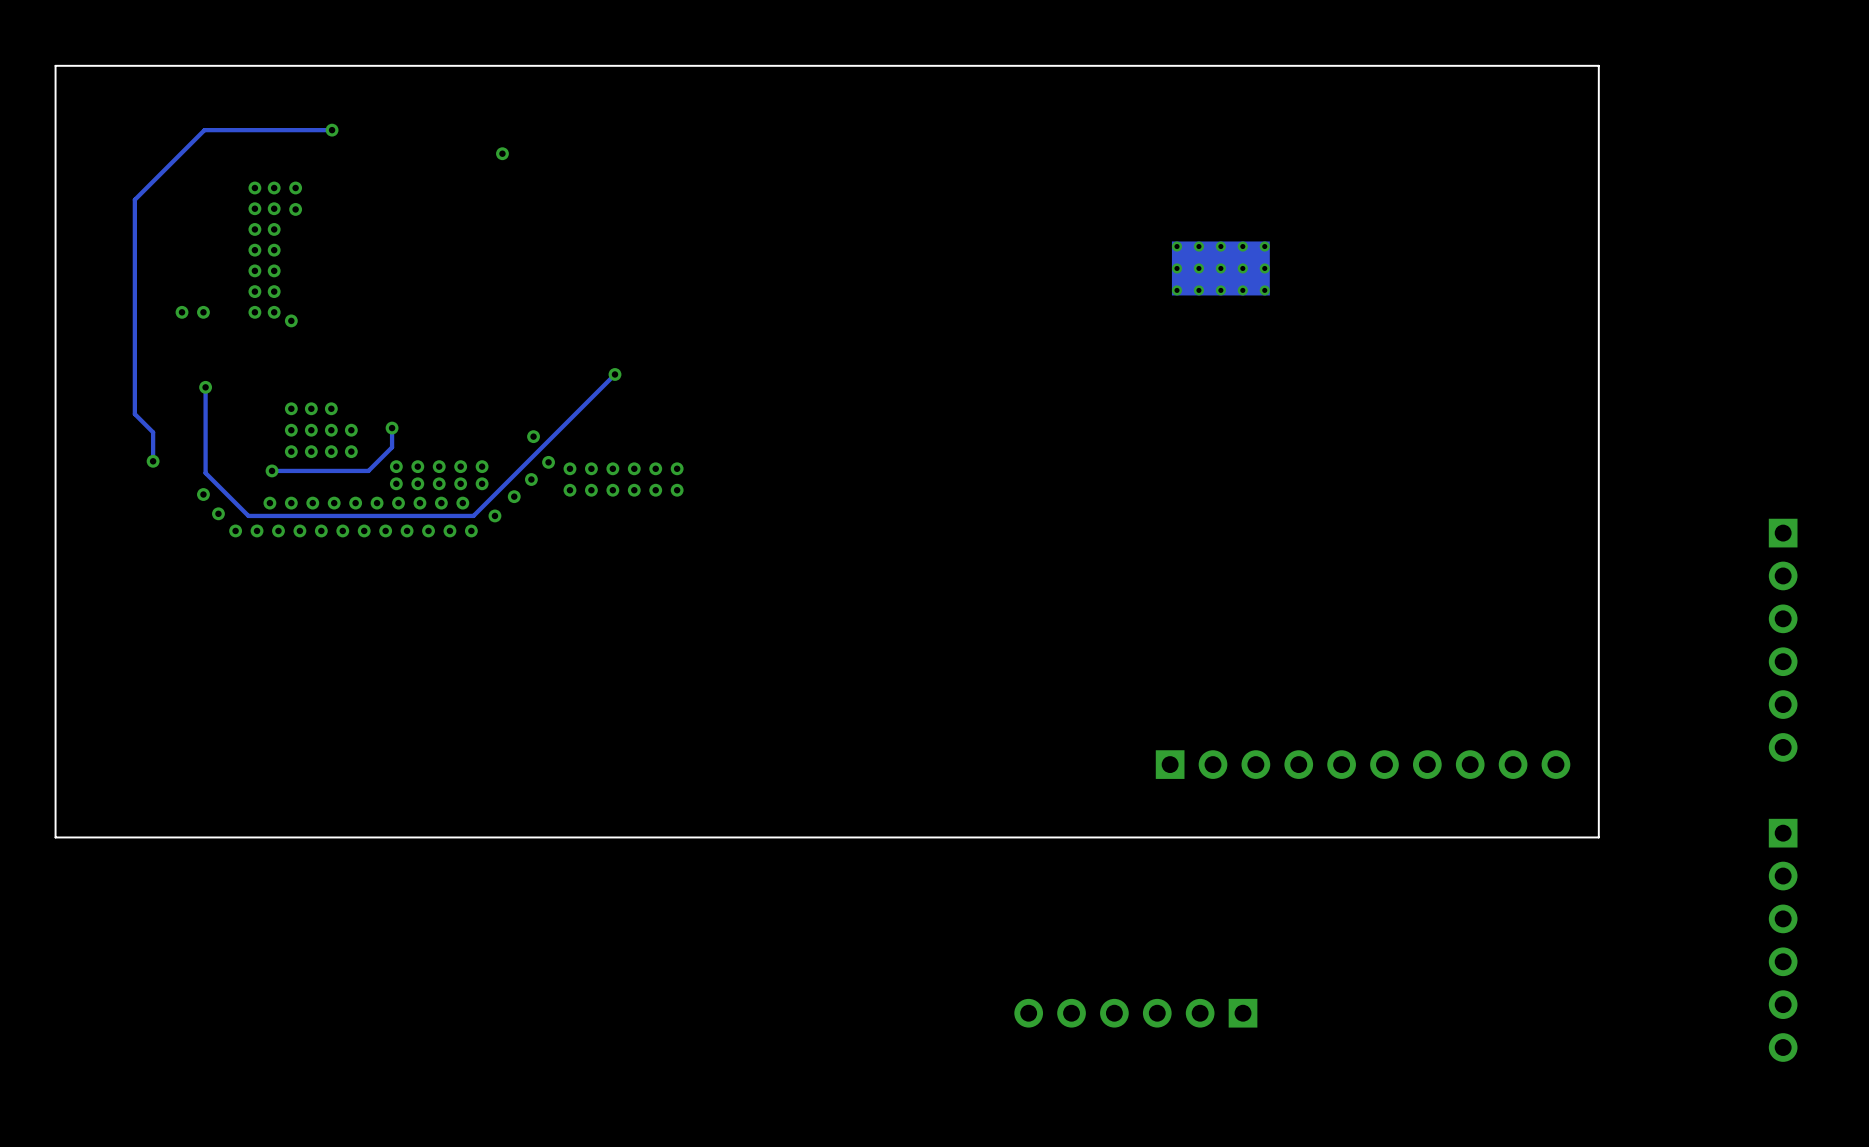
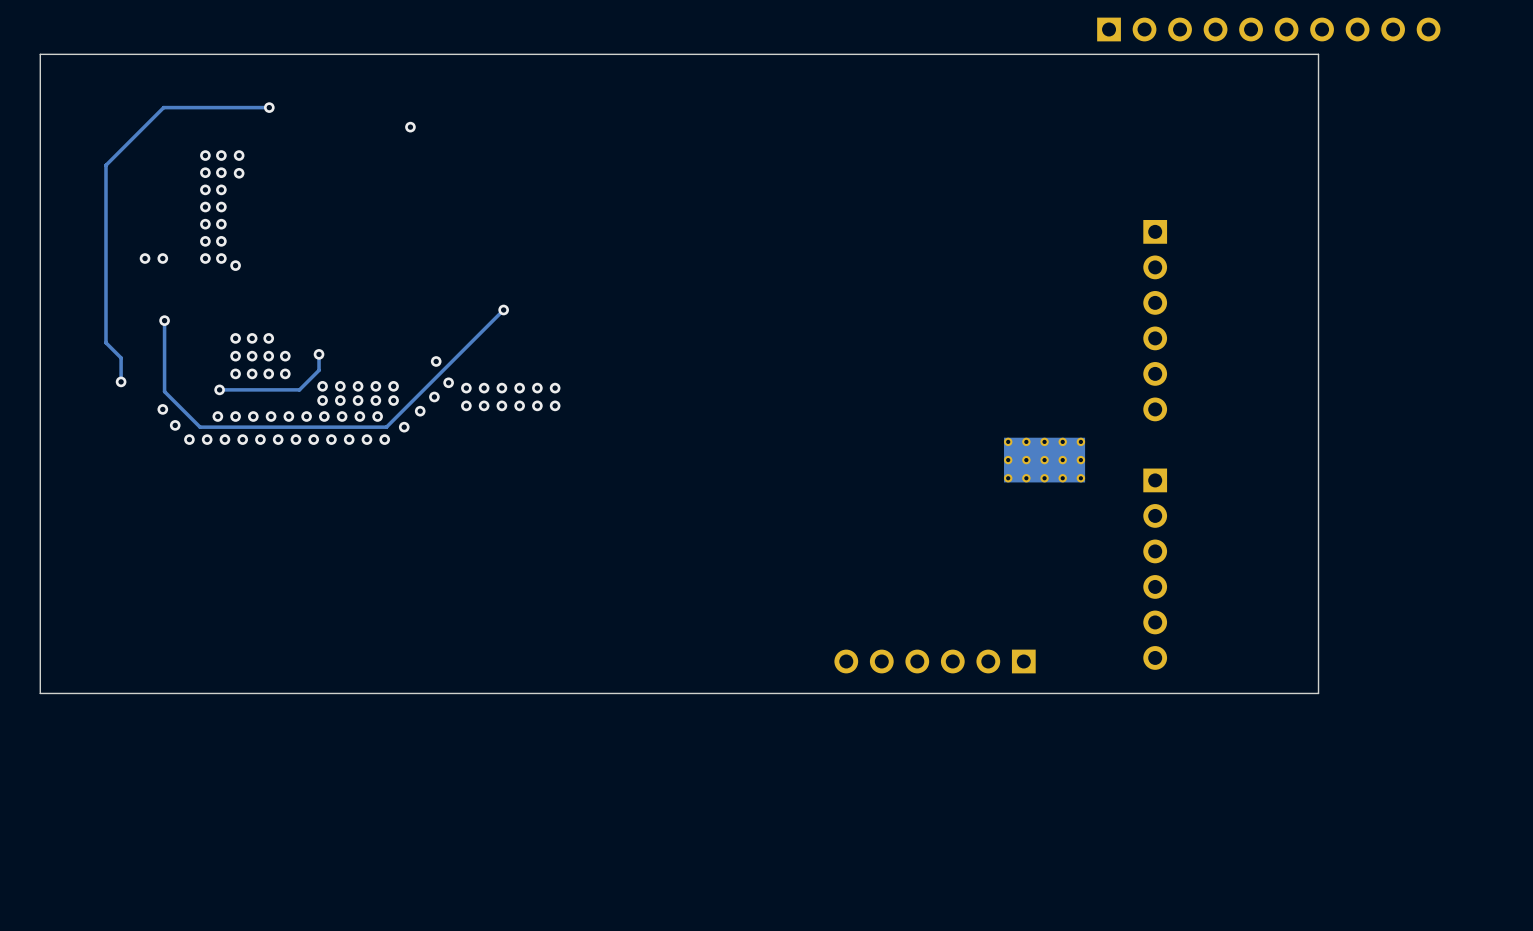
part: none -> (1268, 29)
part position: (1220, 268) -> (1044, 460)
part: none -> (1155, 320)
part: (1783, 640) -> none
part: none -> (1155, 569)
part: (1363, 764) -> none
part: none -> (935, 661)
part: (1783, 940) -> none
part: (1135, 1013) -> none

